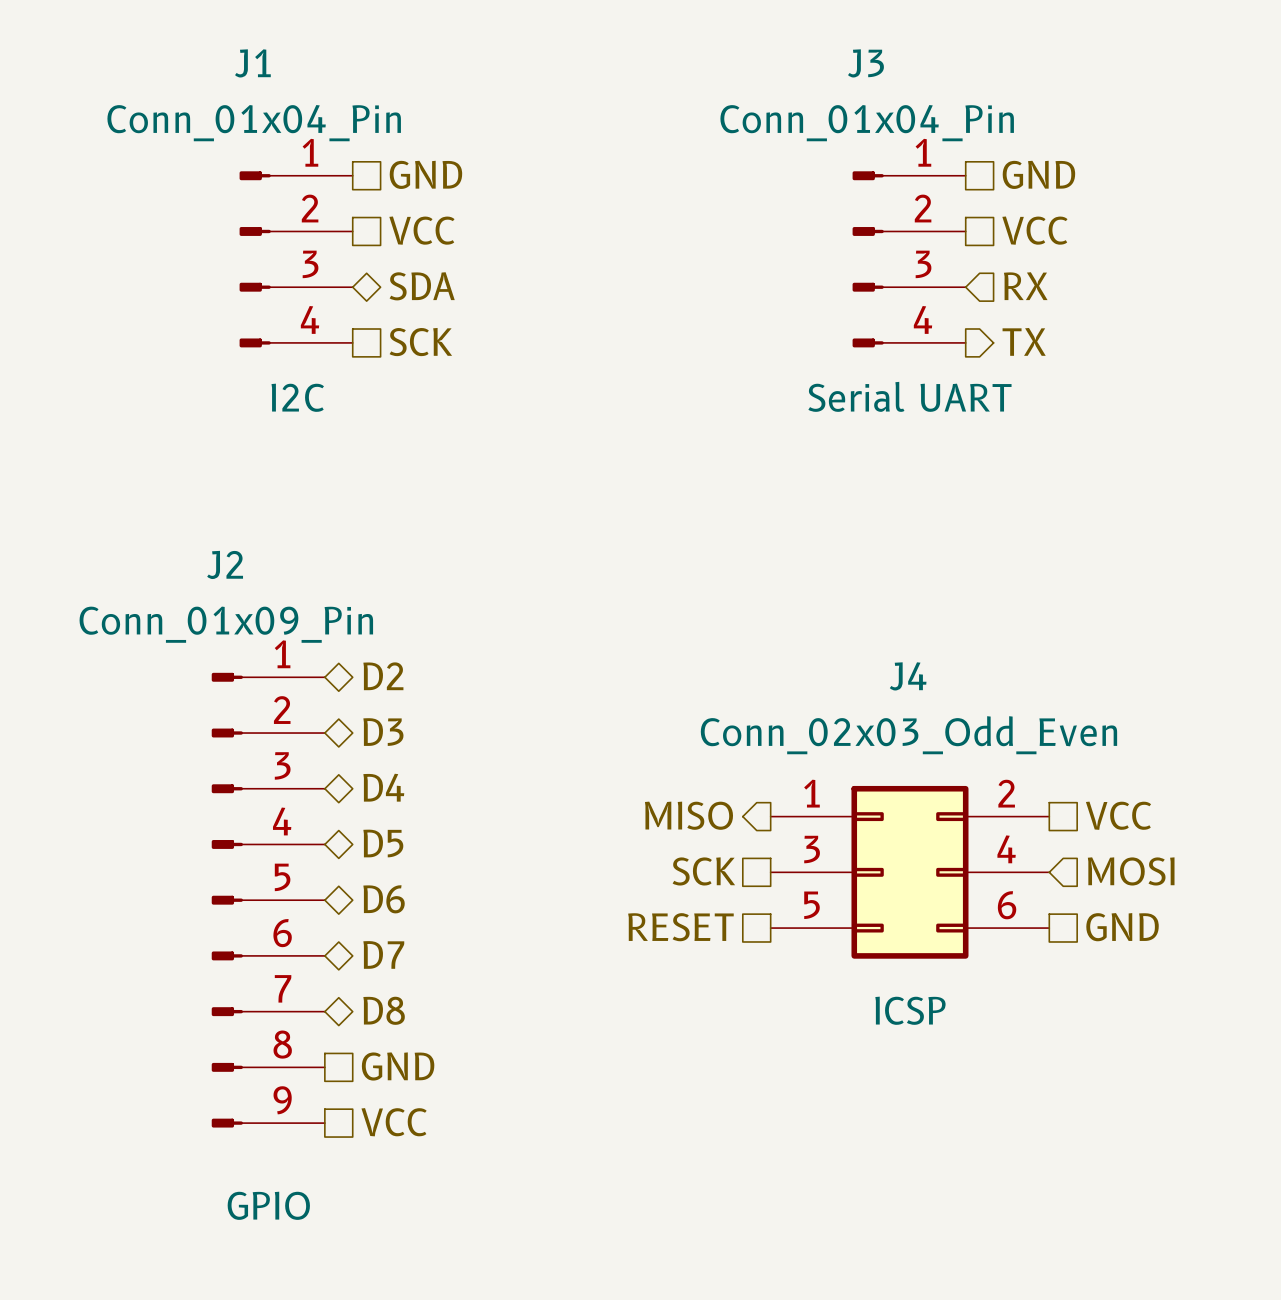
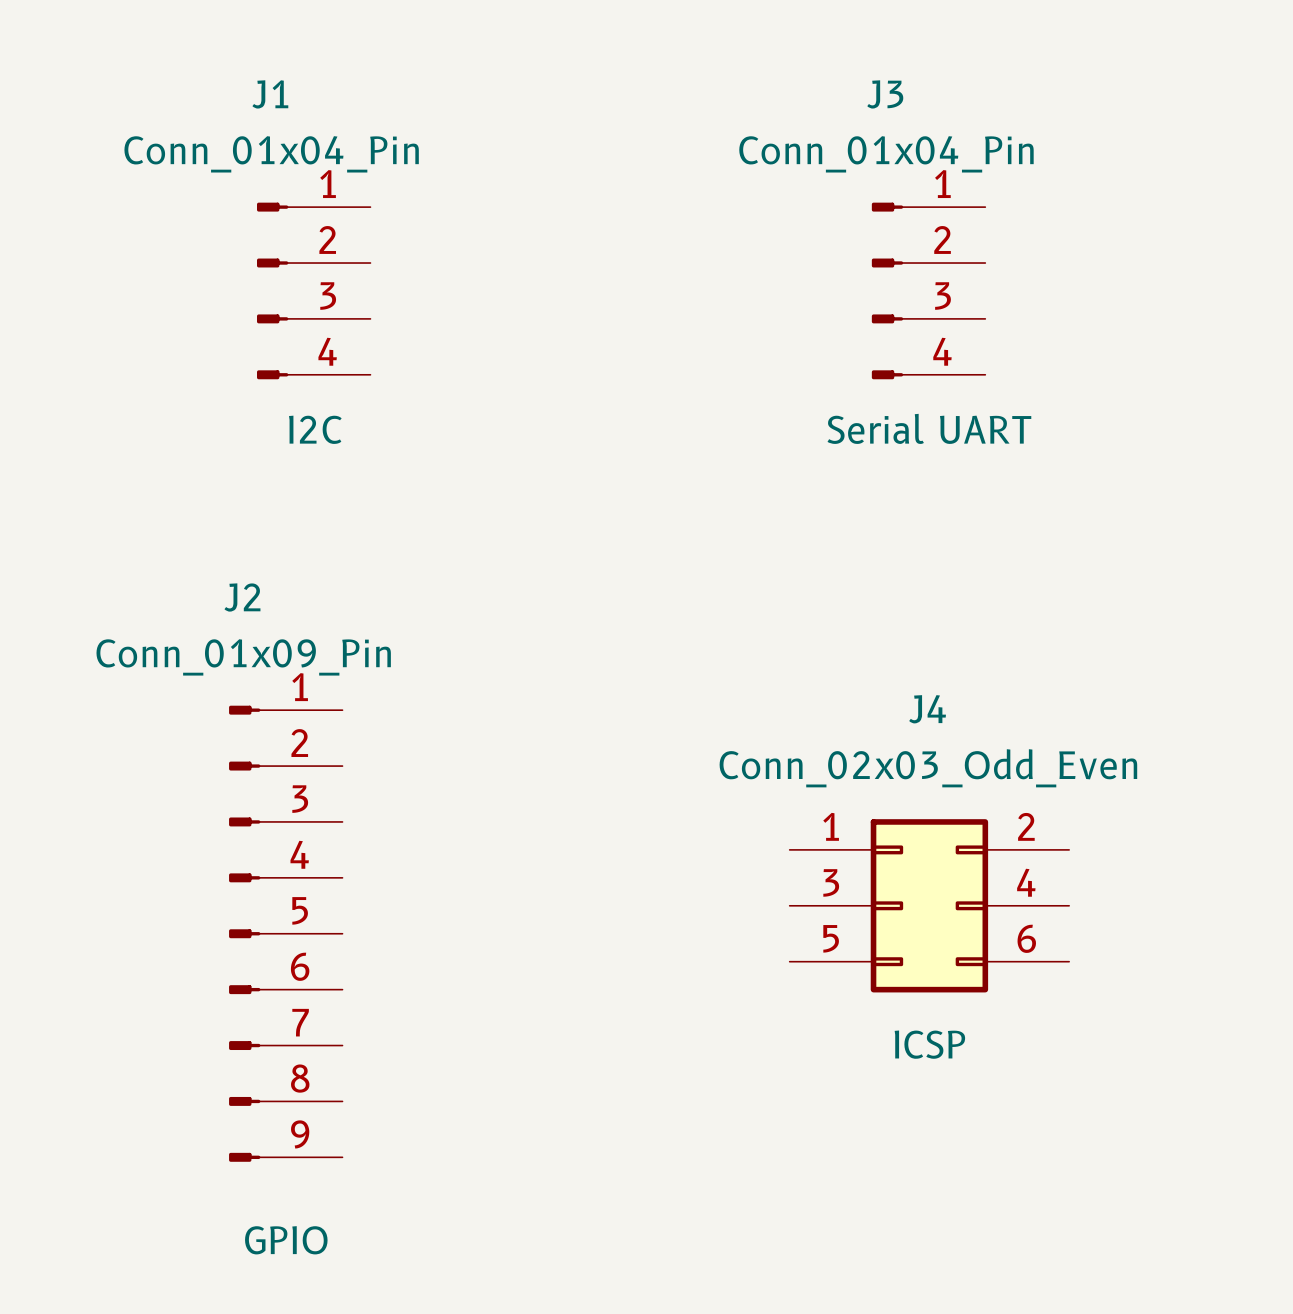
hierarchical label: GND (425, 174) -> none
hierarchical label: GND (1038, 174) -> none
hierarchical label: VCC (421, 230) -> none
hierarchical label: VCC (1034, 230) -> none
hierarchical label: SDA (422, 286) -> none
hierarchical label: RX (1025, 286) -> none
hierarchical label: TX (1024, 341) -> none
hierarchical label: SCK (420, 342) -> none
hierarchical label: D2 (383, 676) -> none
hierarchical label: D3 (383, 732) -> none
hierarchical label: D4 (383, 787) -> none
hierarchical label: MISO (688, 815) -> none
hierarchical label: VCC (1118, 815) -> none
hierarchical label: D5 (383, 843) -> none
hierarchical label: SCK (703, 871) -> none
hierarchical label: MOSI (1131, 871) -> none
hierarchical label: D6 (384, 899) -> none
hierarchical label: RESET (680, 927) -> none
hierarchical label: GND (1122, 927) -> none
hierarchical label: D7 (383, 954) -> none
hierarchical label: D8 (384, 1010) -> none
hierarchical label: GND (398, 1066) -> none
hierarchical label: VCC (394, 1122) -> none

